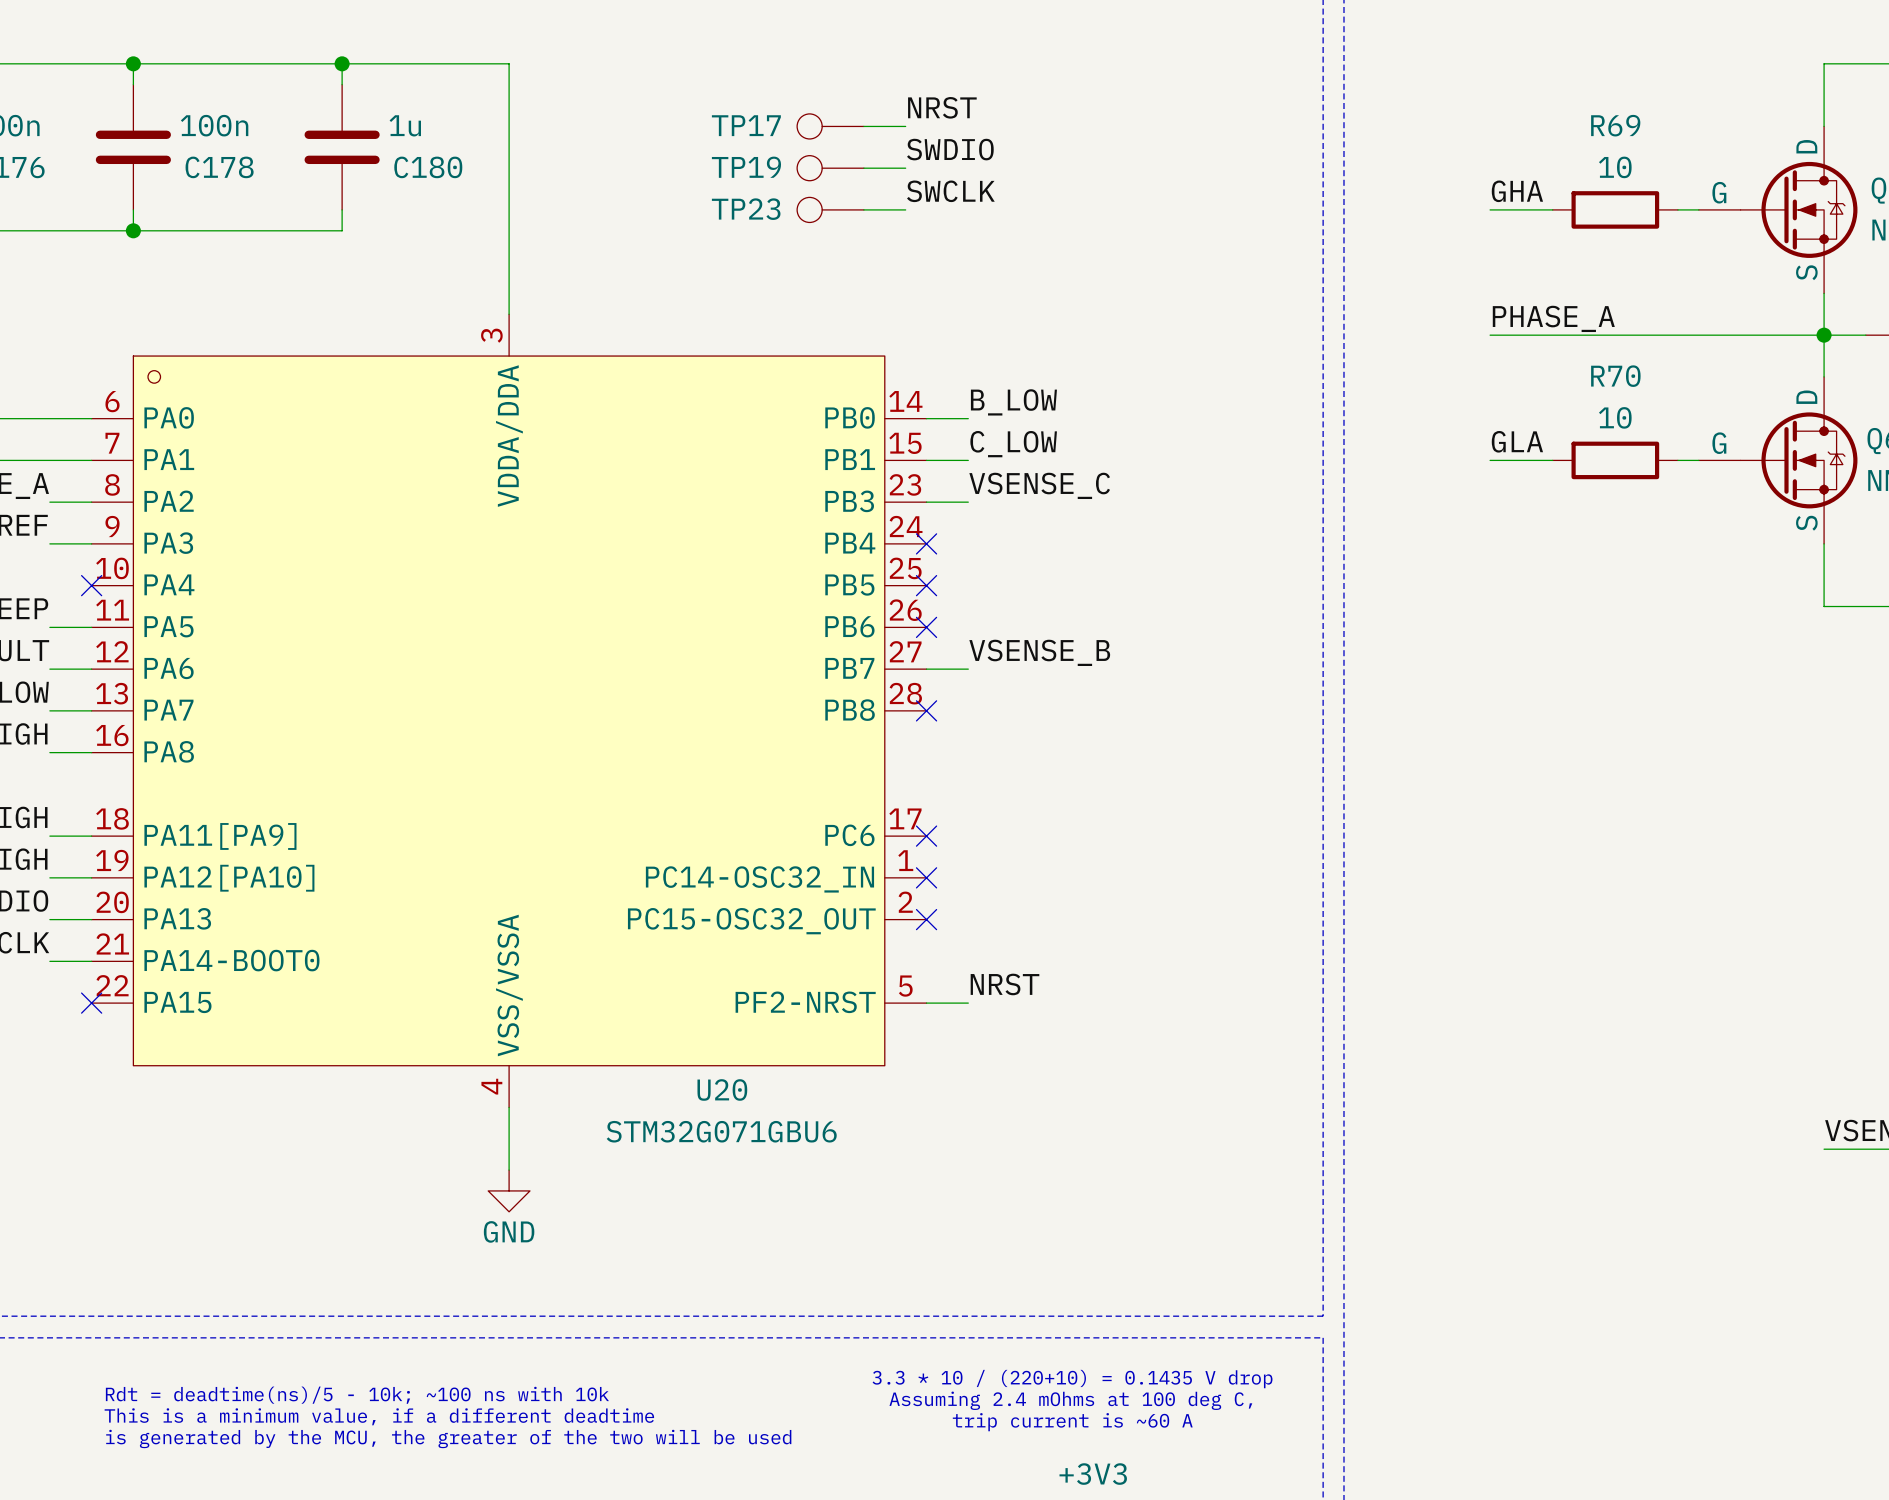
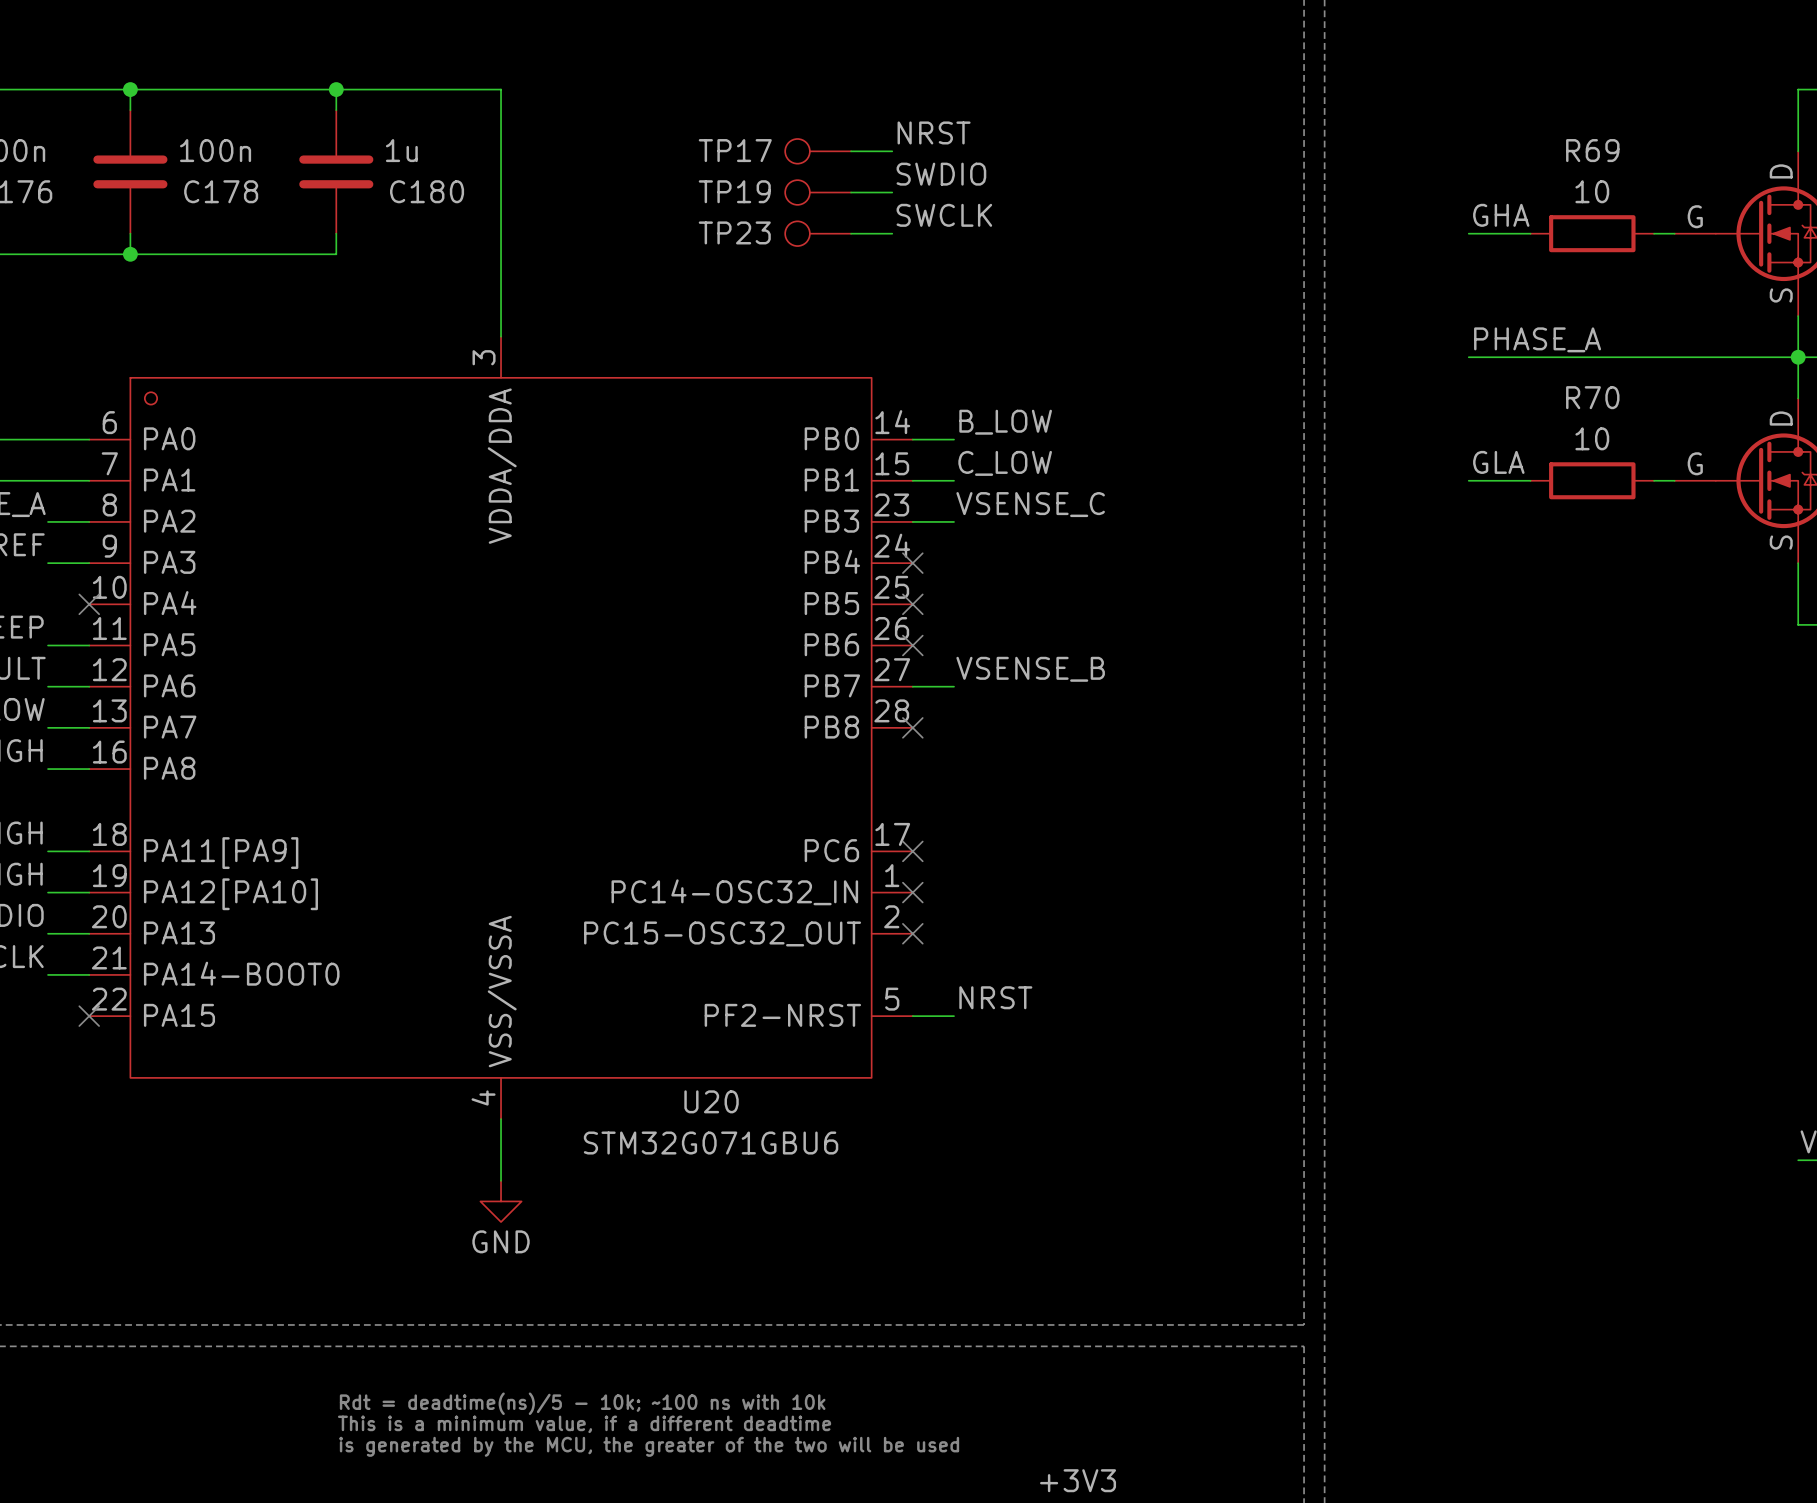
text: 3.3 * 10 / (220+10) = 0.1435 V drop (1072, 1379) -> none
text position: Rdt = deadtime(ns)/5 - 10k; ~100 ns with 10k (357, 1395) -> Rdt = deadtime(ns)/5 - 10k; ~100 ns with 10k (582, 1403)
text: Assuming 2.4 mOhms at 100 deg C, (1070, 1400) -> none
text position: This is a minimum value, if a different deadtime (379, 1416) -> This is a minimum value, if a different deadtime (584, 1424)
text: trip current is ~60 A (1072, 1422) -> none
text position: is generated by the MCU, the greater of the two will be used (448, 1439) -> is generated by the MCU, the greater of the two will be used (649, 1446)

